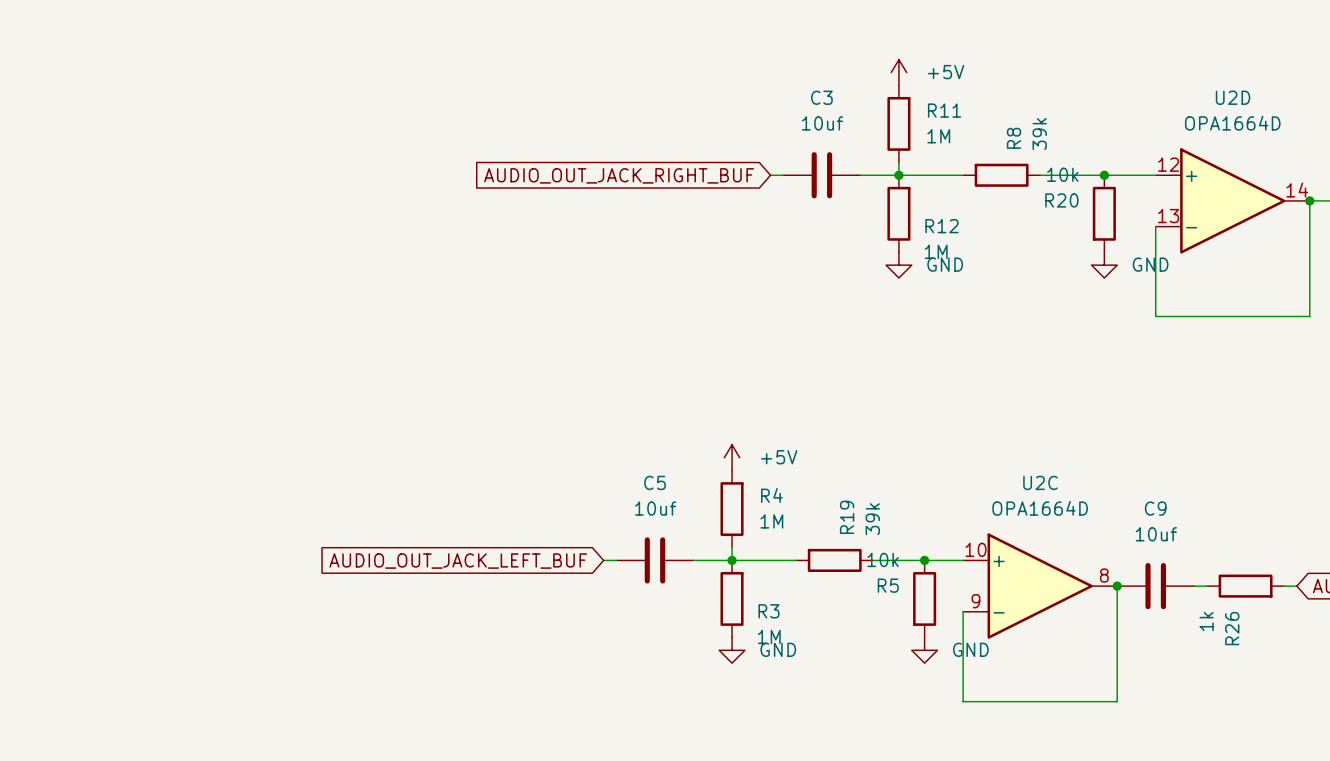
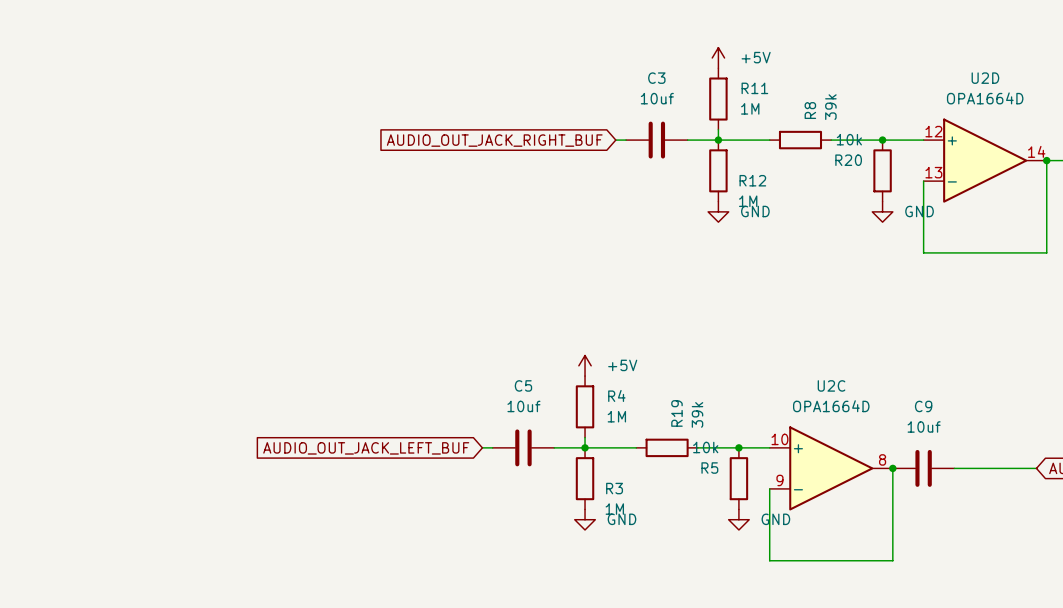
wire: none -> (964, 468) (1026, 468)
R26: 1k (1245, 586) -> none

